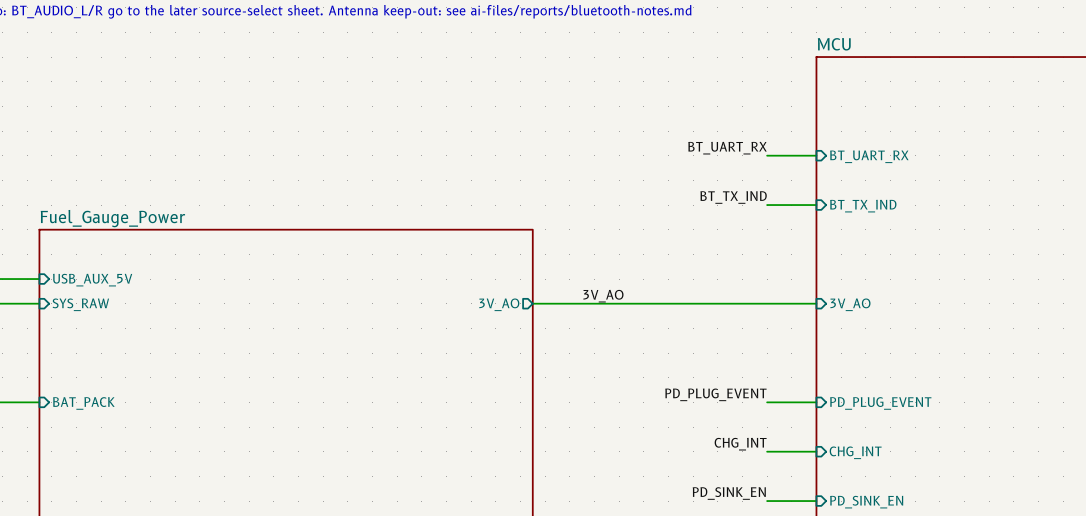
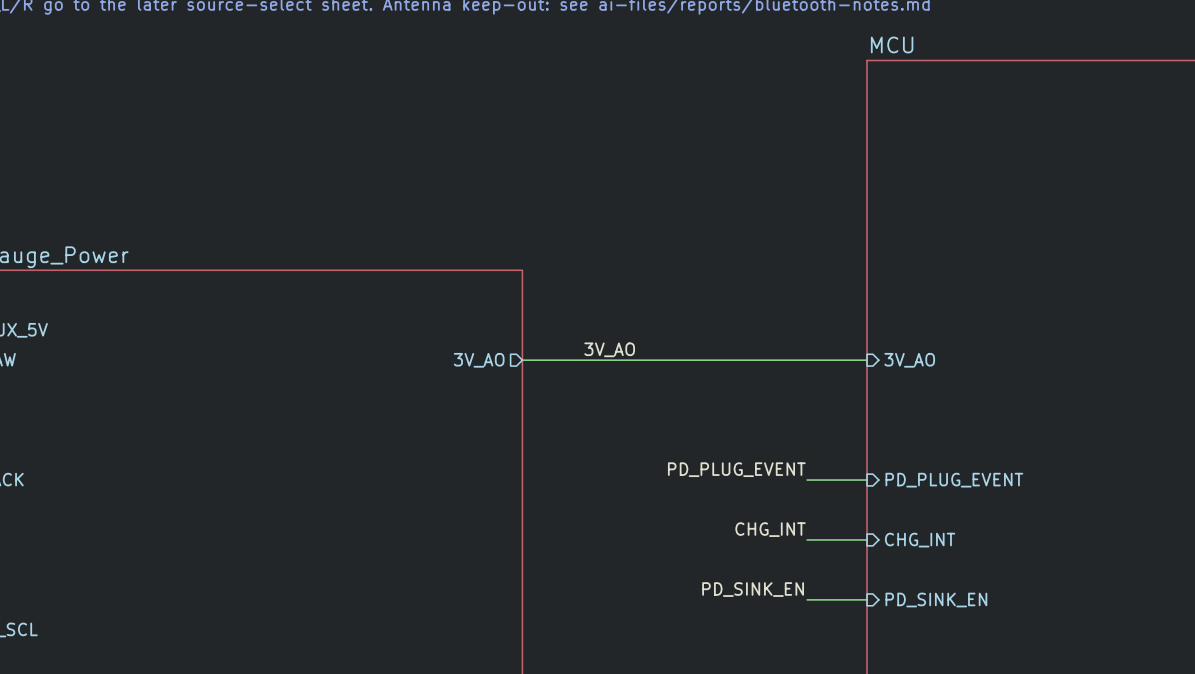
label: BT_UART_RX (727, 148) -> none
wire: (767, 155) (816, 155) -> none
sheet pin: BT_UART_RX (869, 156) -> none
label: BT_TX_IND (733, 197) -> none
wire: (767, 205) (816, 205) -> none
sheet pin: BT_TX_IND (863, 206) -> none

